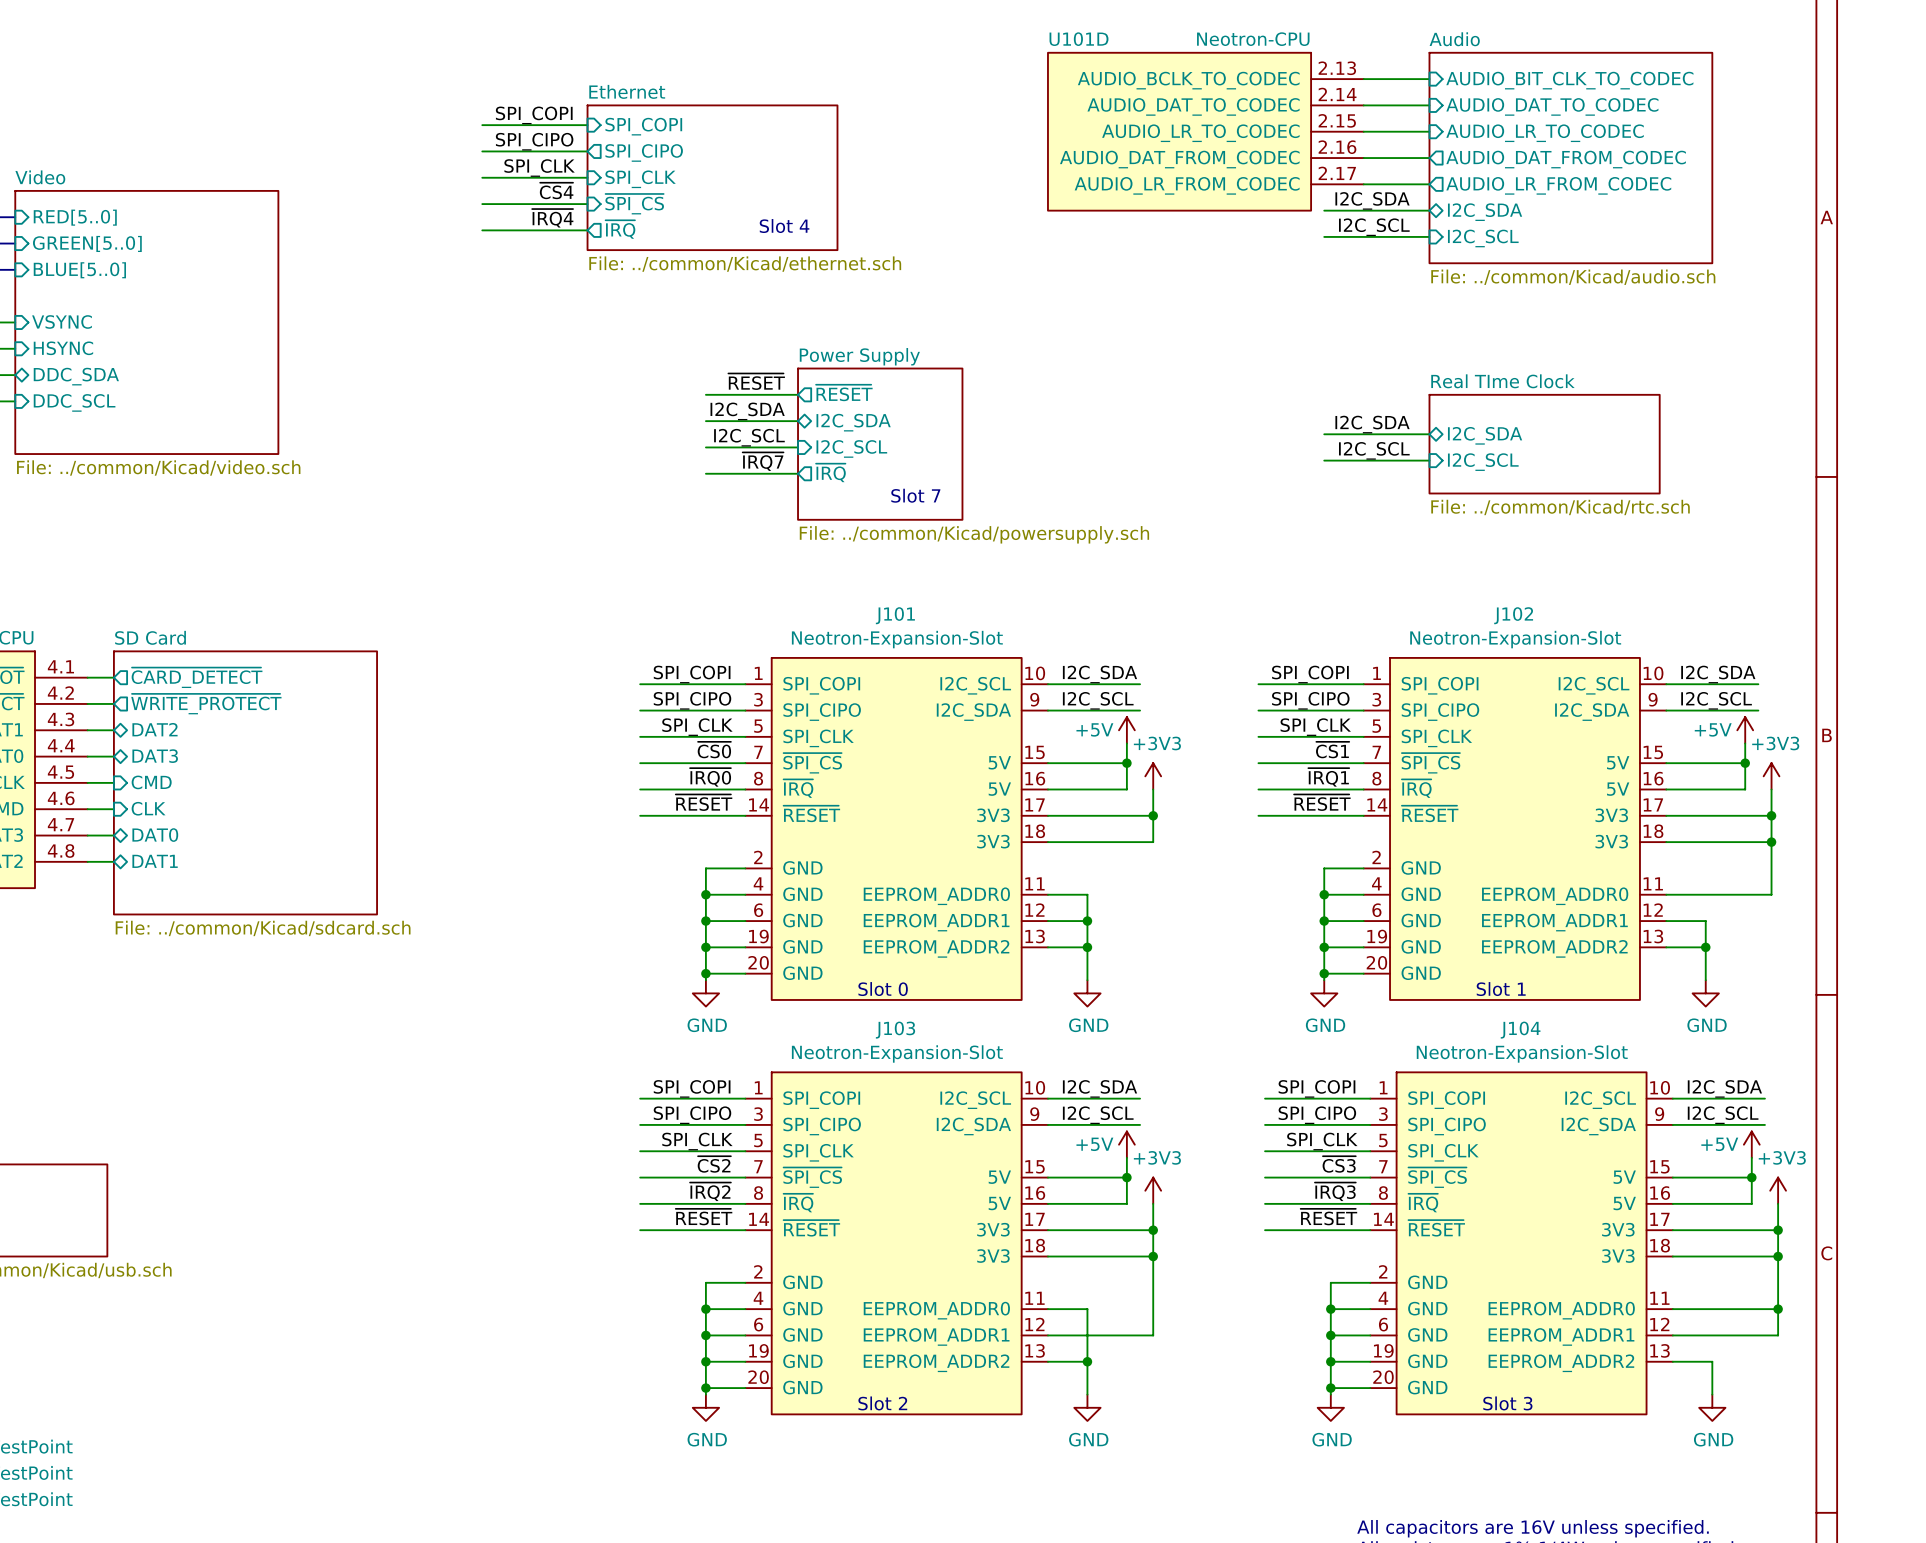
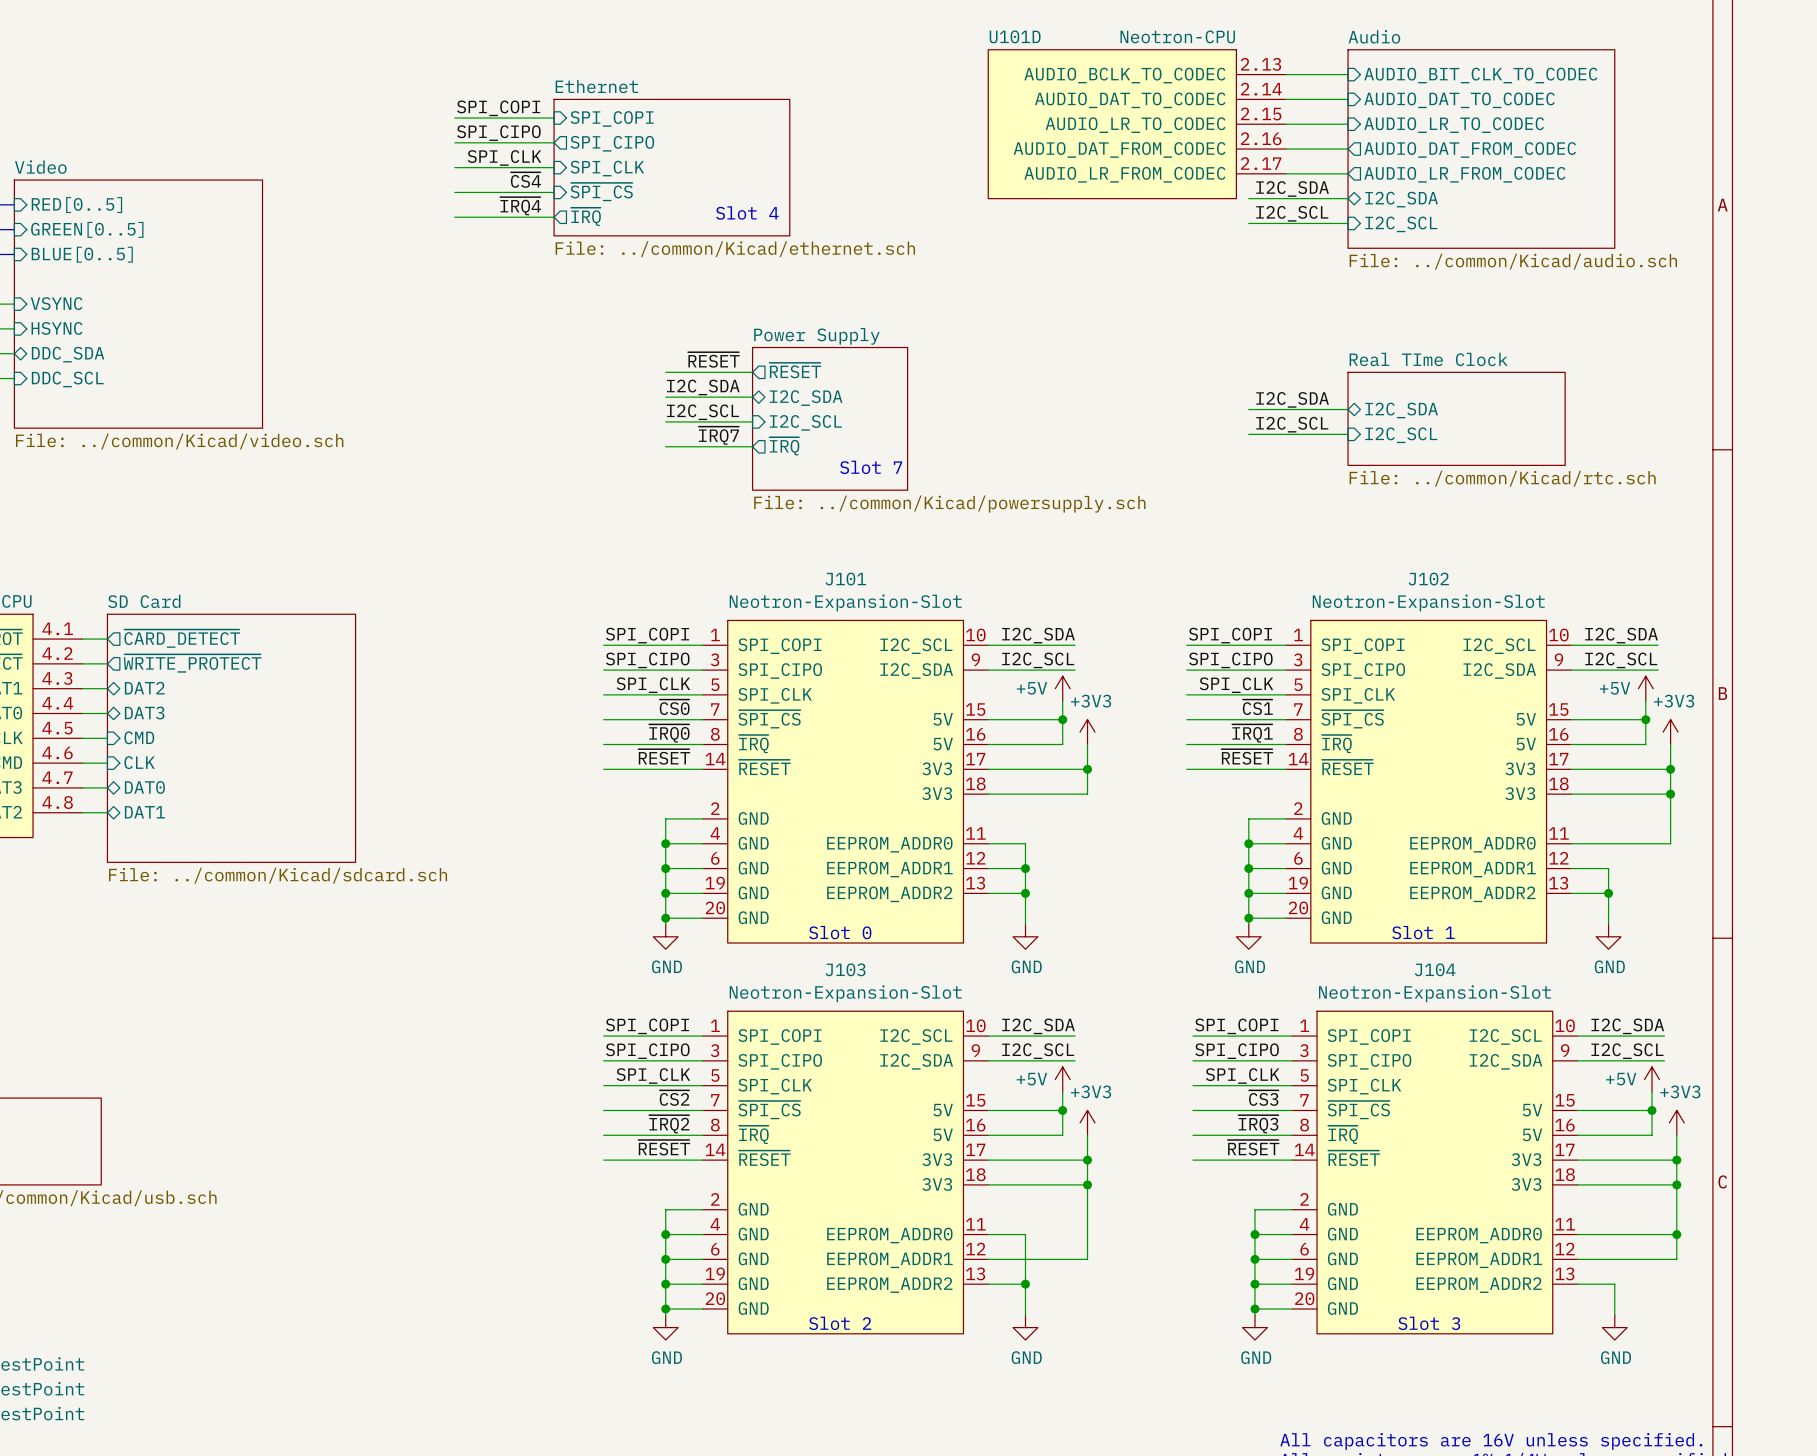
sheet pin: RED[5..0] (75, 217) -> RED[0..5] (76, 205)
sheet pin: GREEN[5..0] (87, 243) -> GREEN[0..5] (87, 229)
sheet pin: BLUE[5..0] (79, 270) -> BLUE[0..5] (82, 254)

